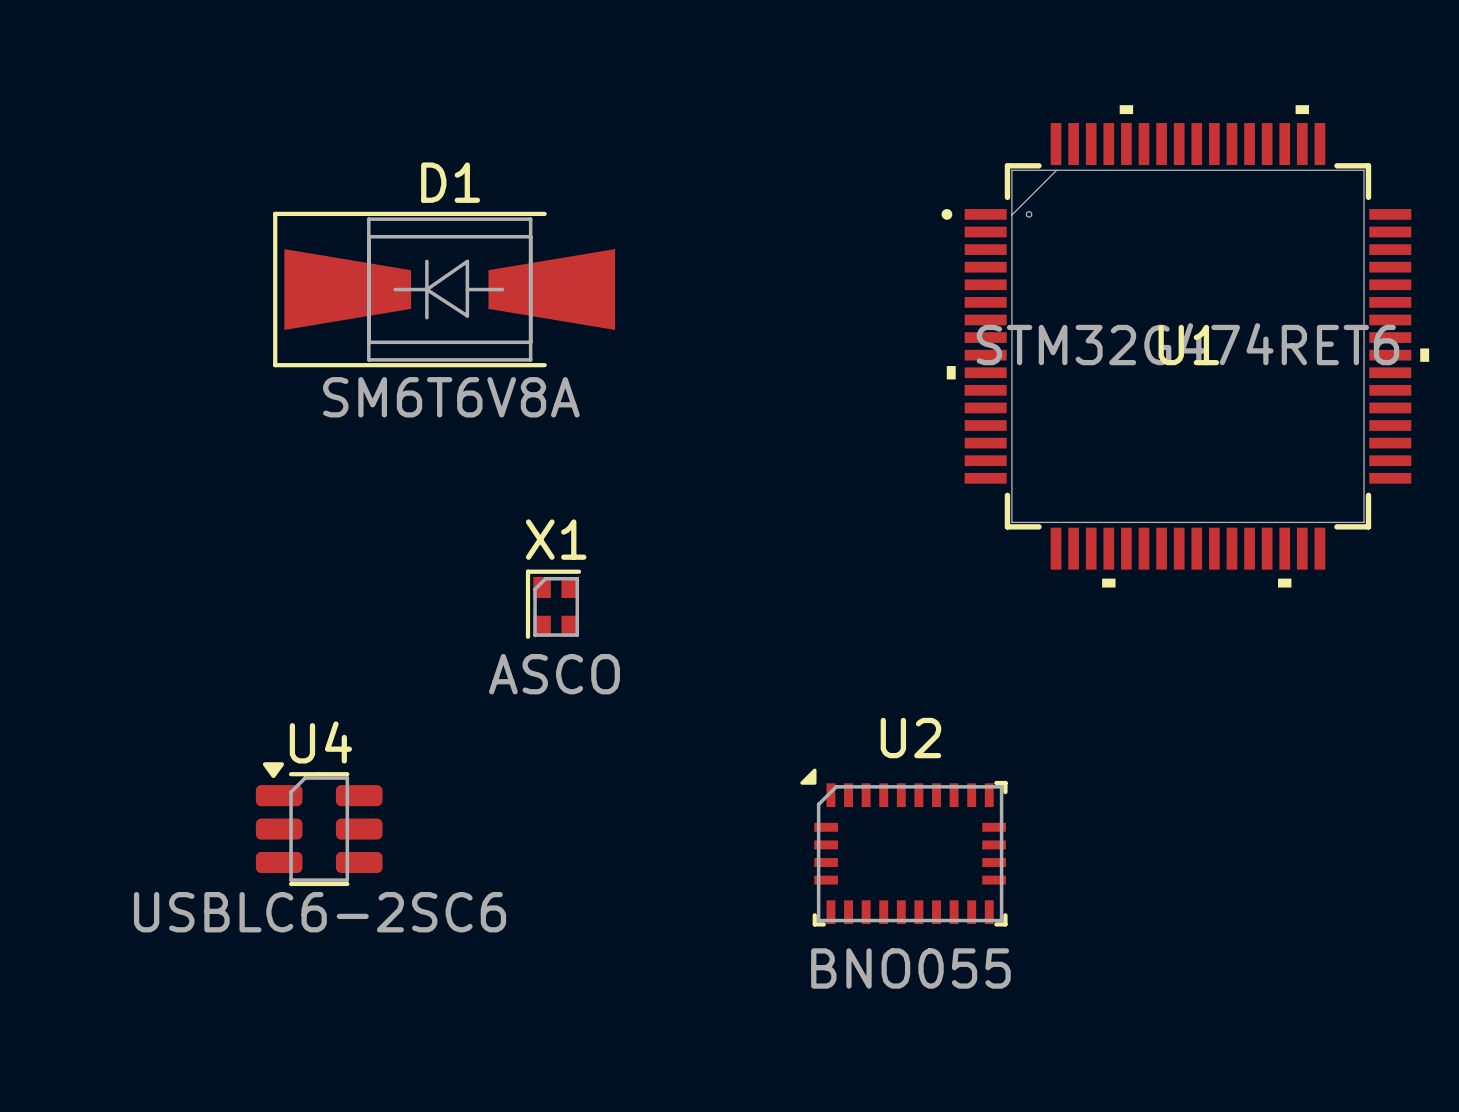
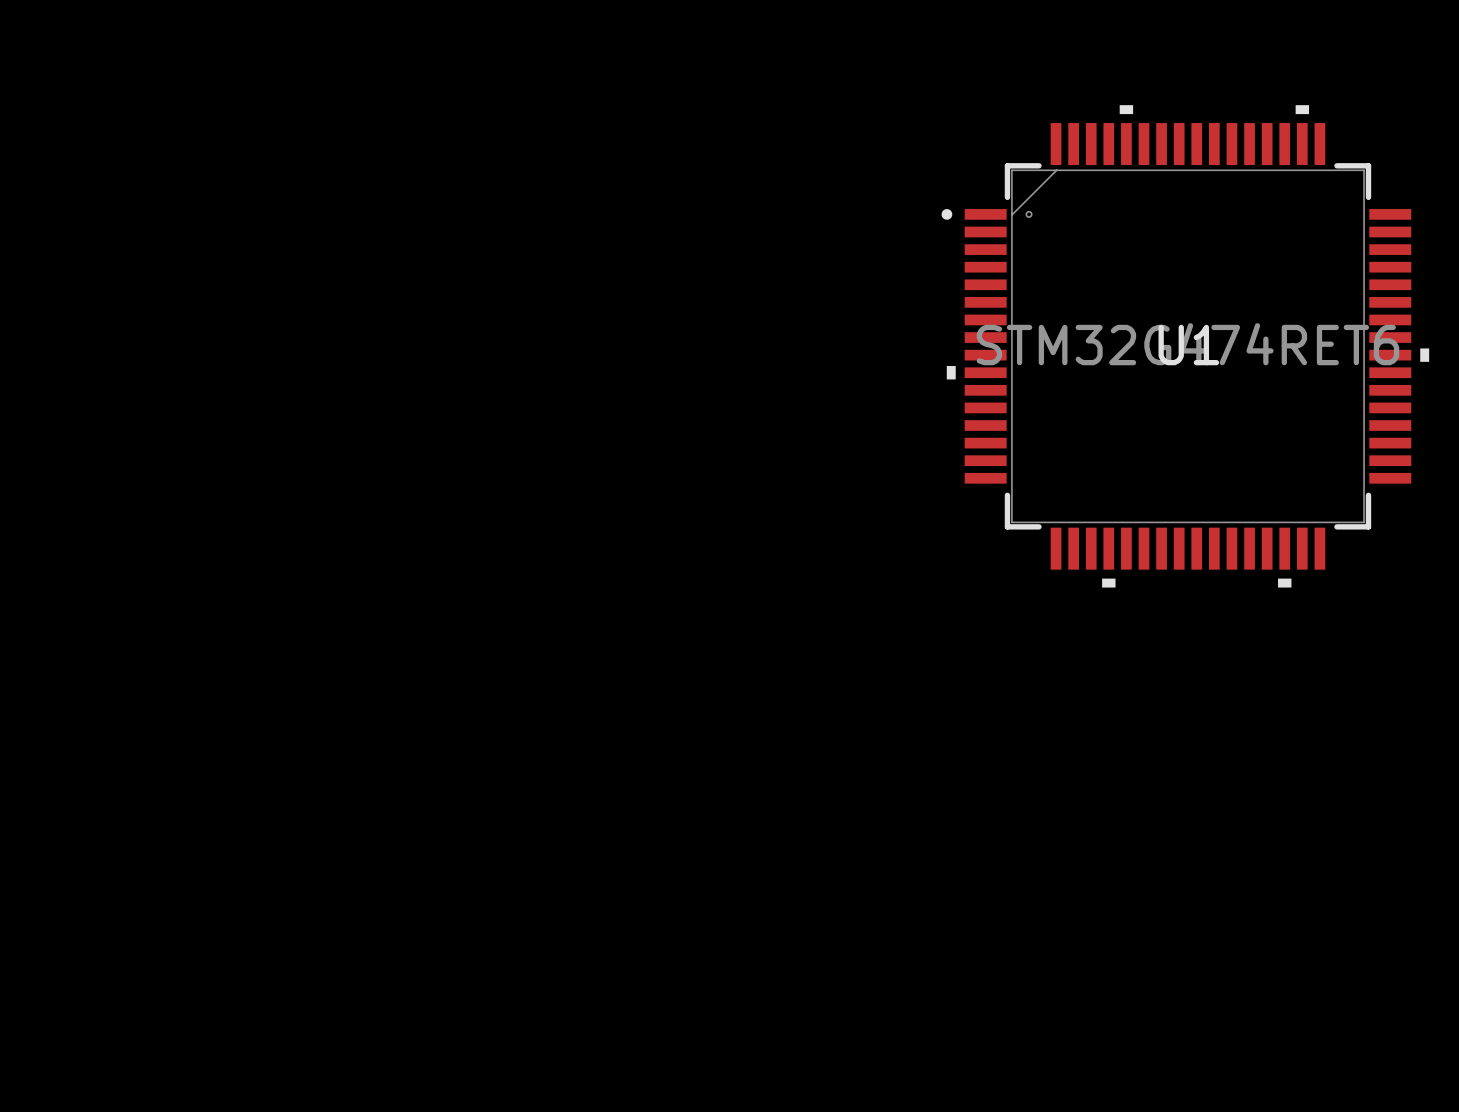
D1: SM6T6V8A (444, 289) -> none
X1: ASCO (553, 604) -> none
U4: USBLC6-2SC6 (319, 824) -> none
U2: BNO055 (903, 847) -> none

